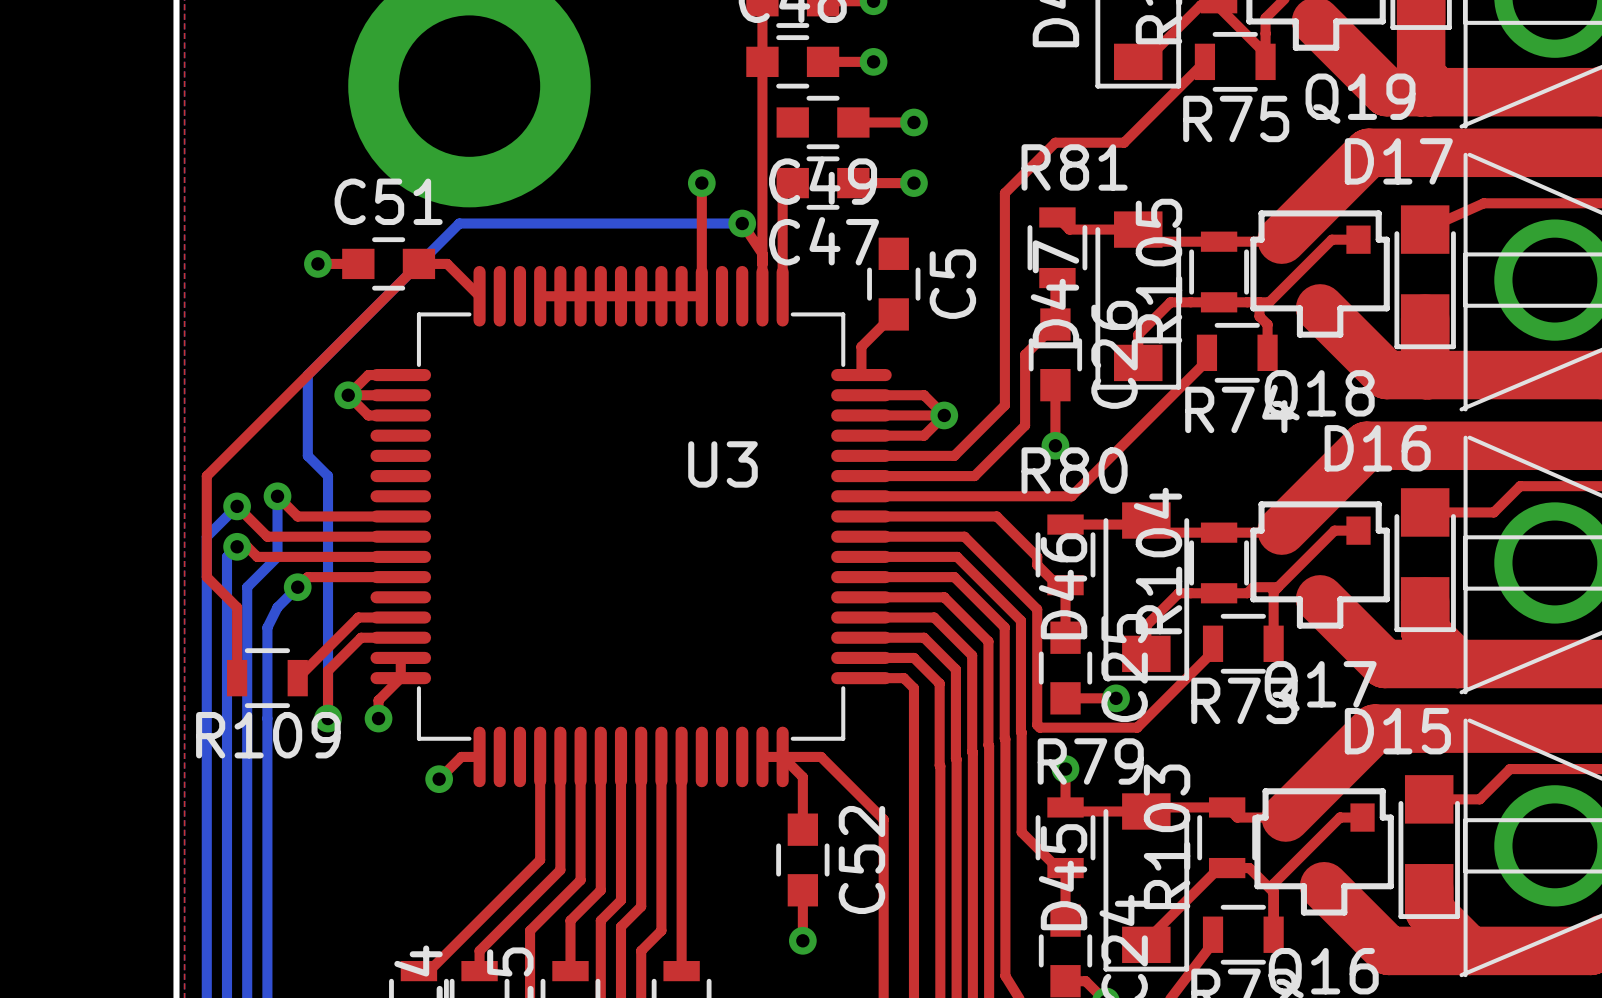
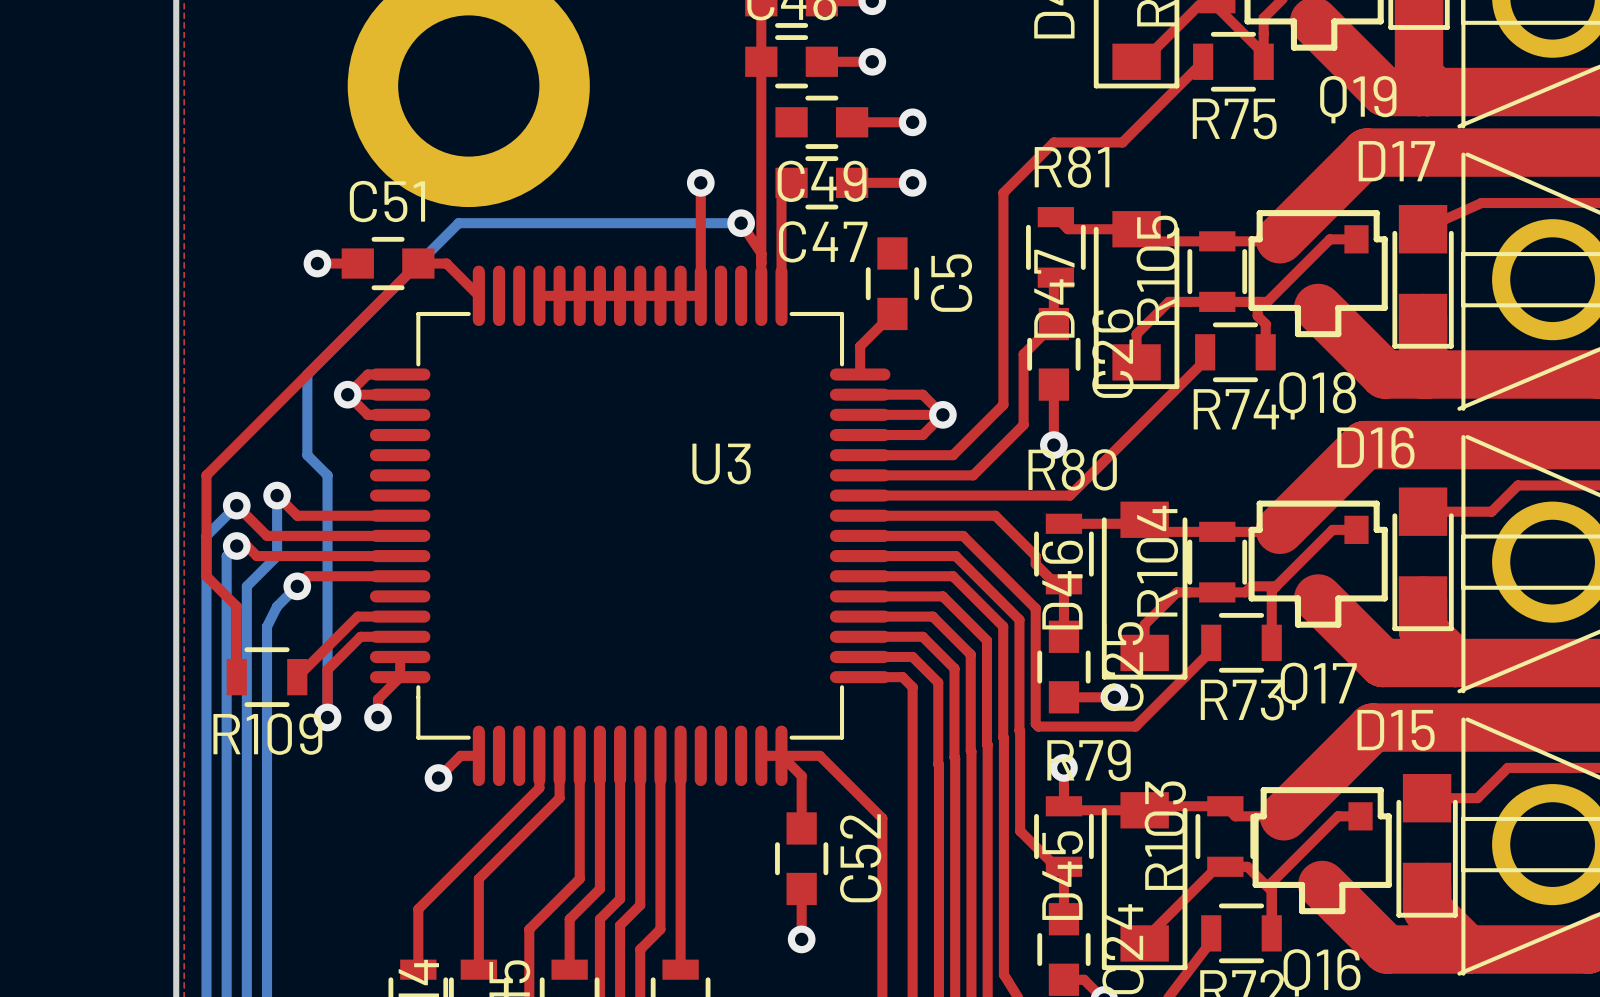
top track: (540, 789) (540, 859) (429, 971) (418, 971) -> (539, 788) (418, 909) (418, 969)
top track: (560, 799) (560, 870) (479, 950) -> (559, 798) (478, 878) (478, 949)

